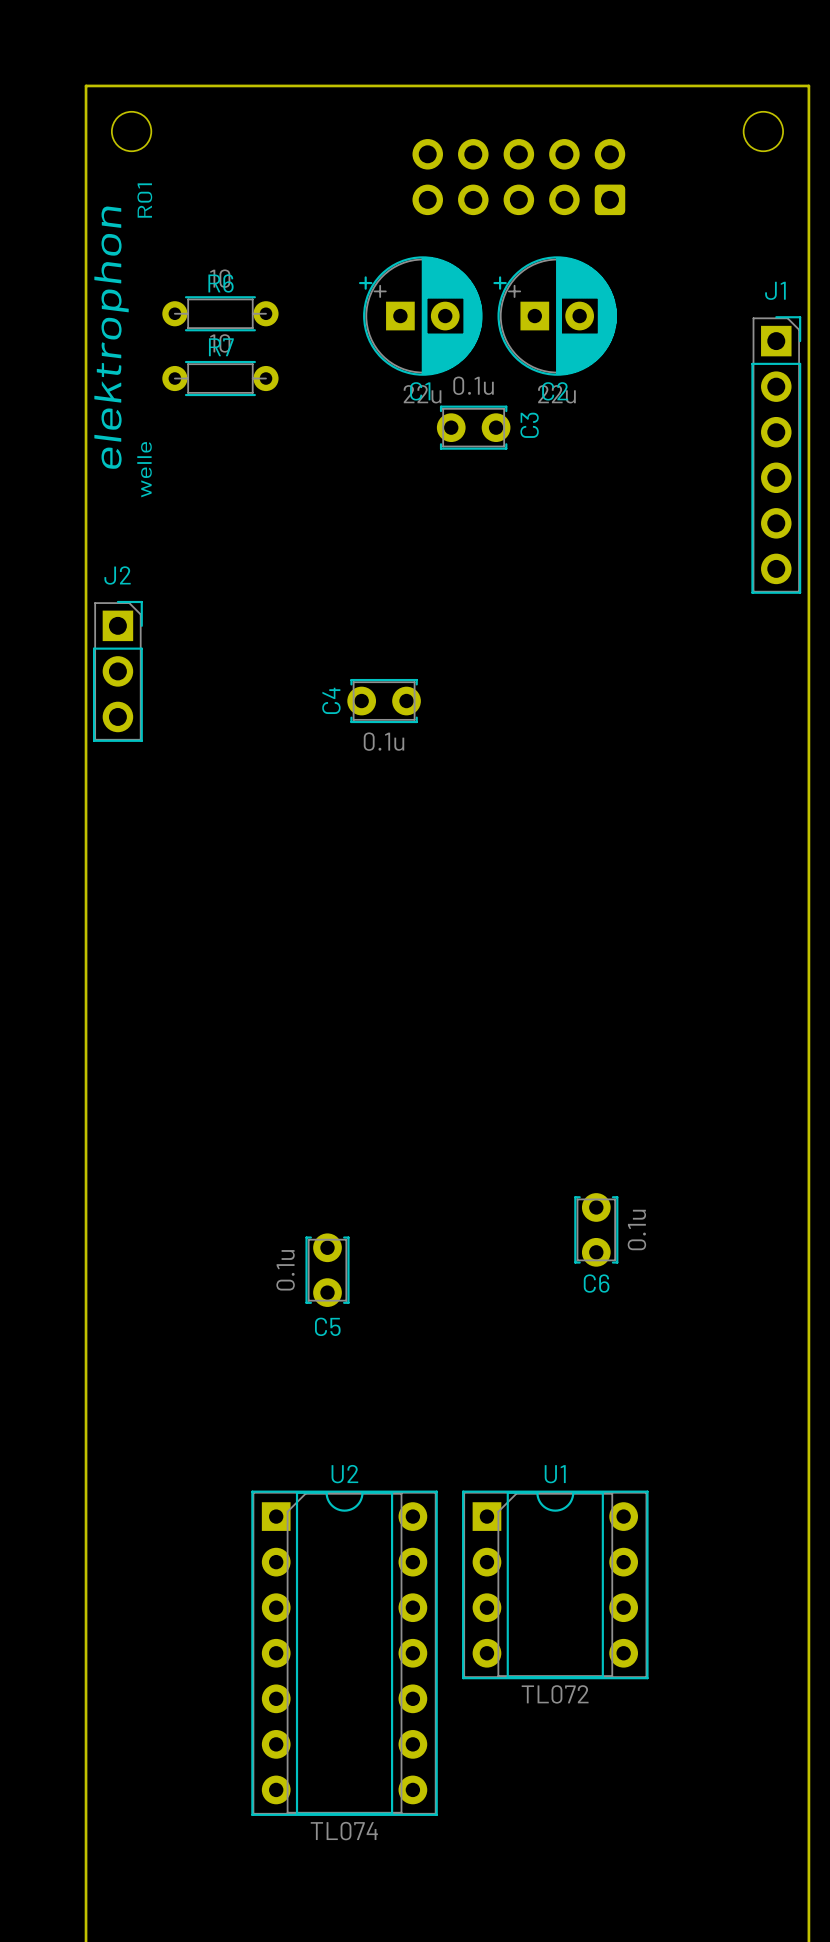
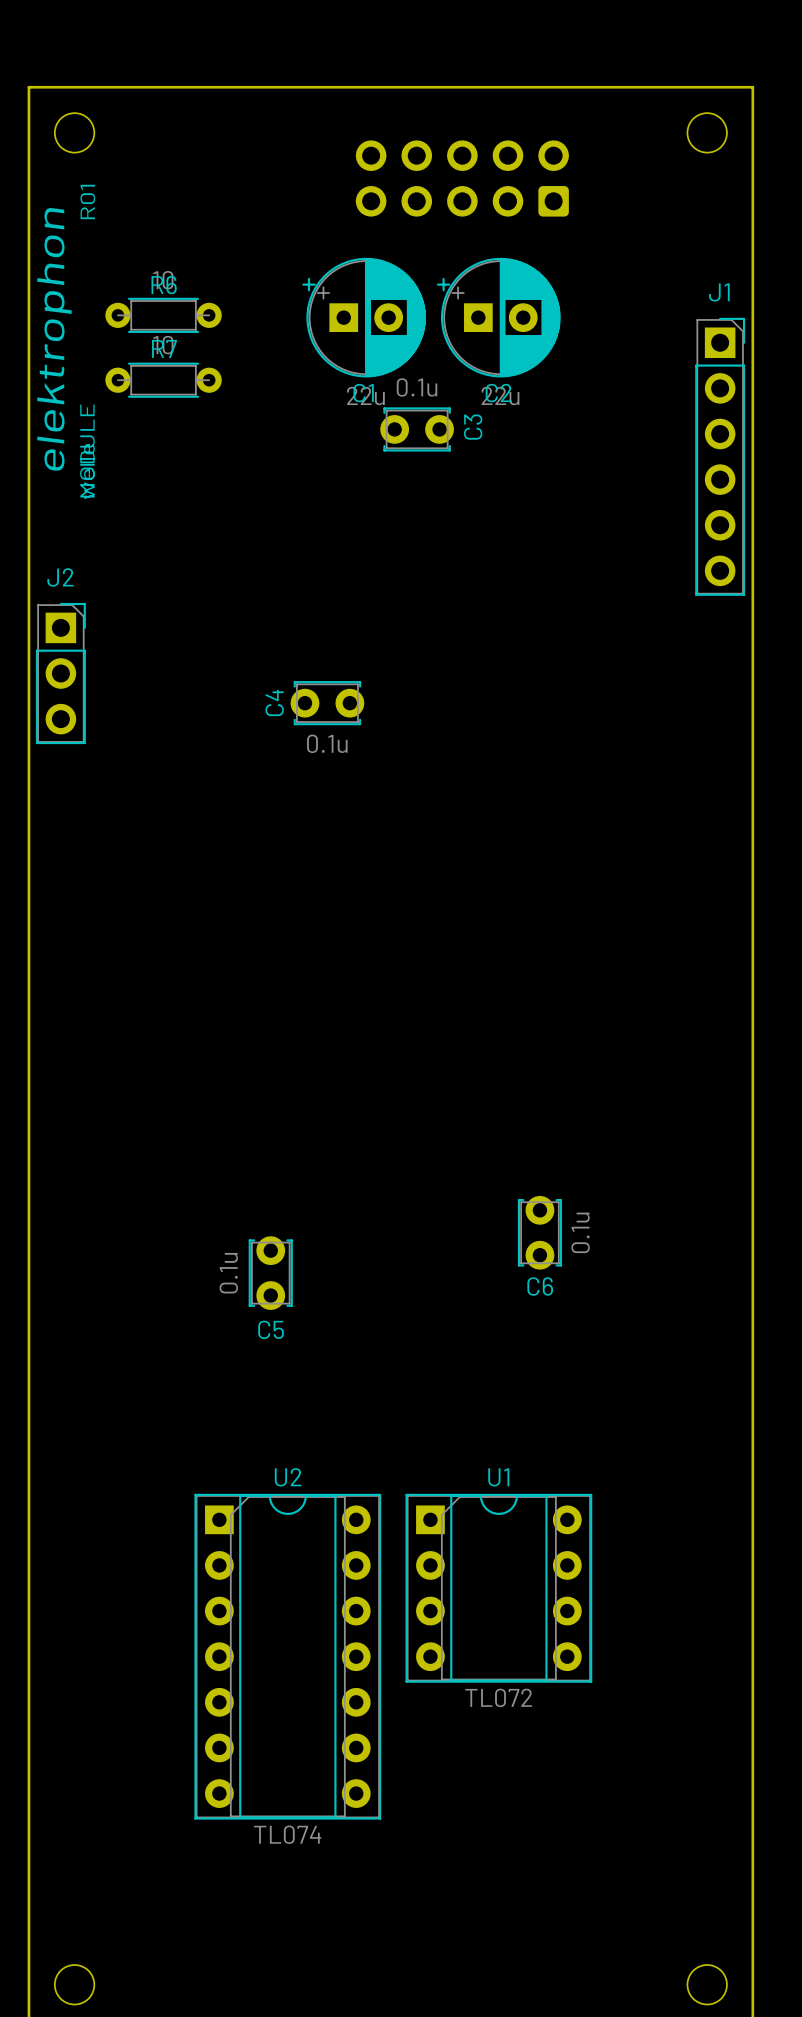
drawing shape: [94, 183, 153, 498] -> [37, 184, 96, 500]

